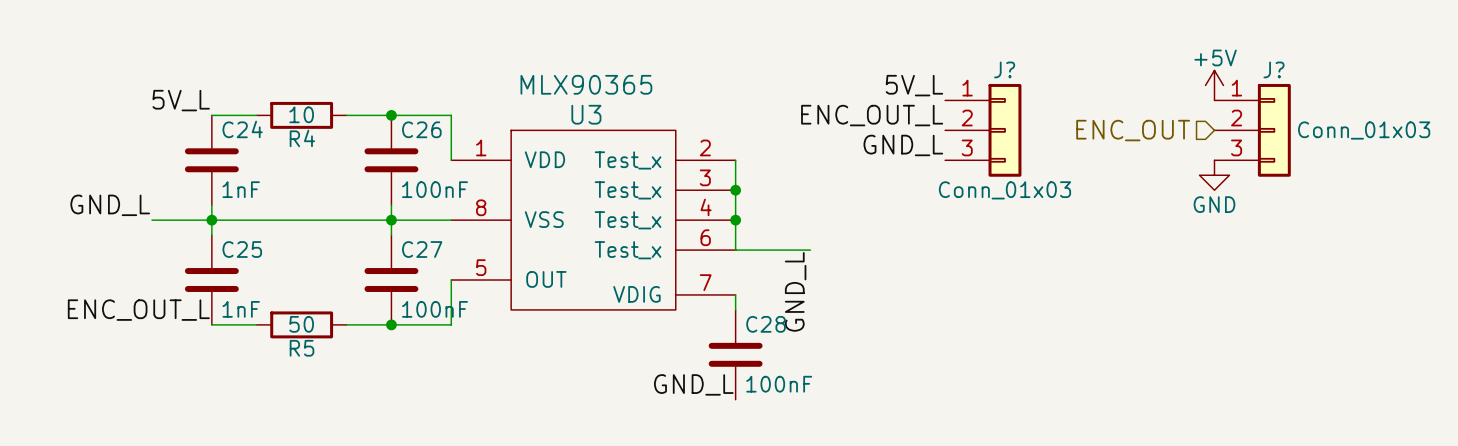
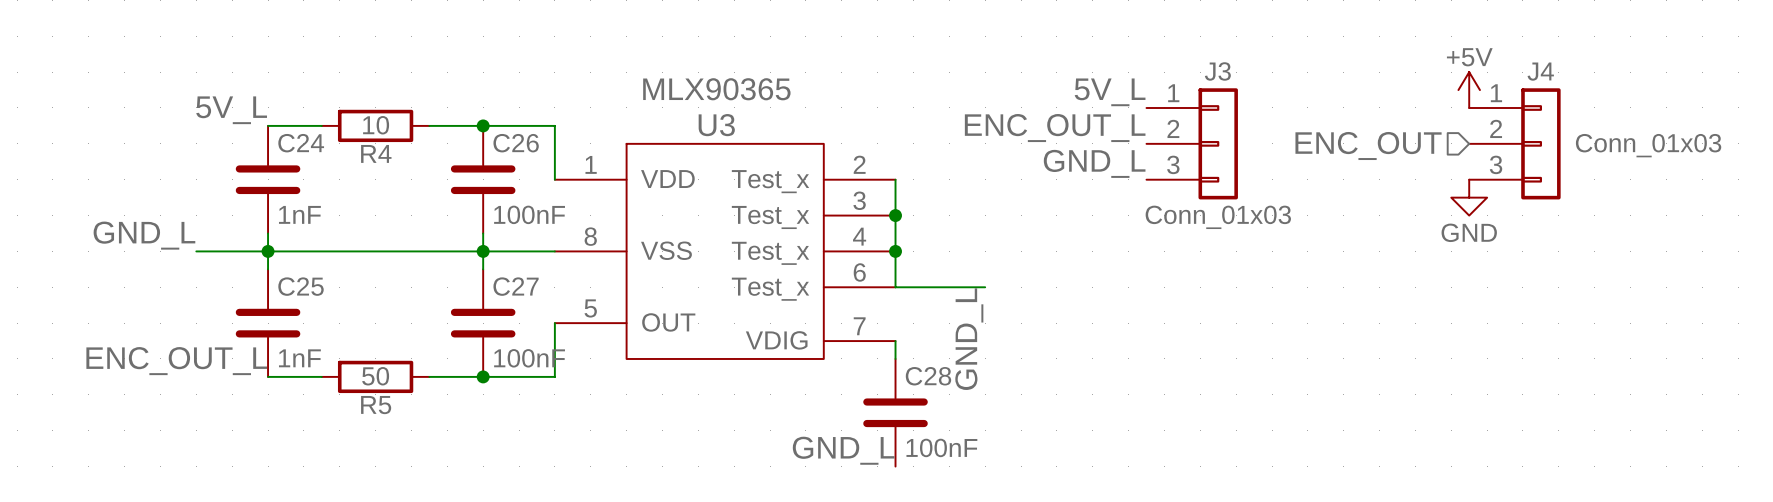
J? name: J? (1004, 69) -> J3 (1217, 71)
J? name: J? (1273, 69) -> J4 (1540, 71)

